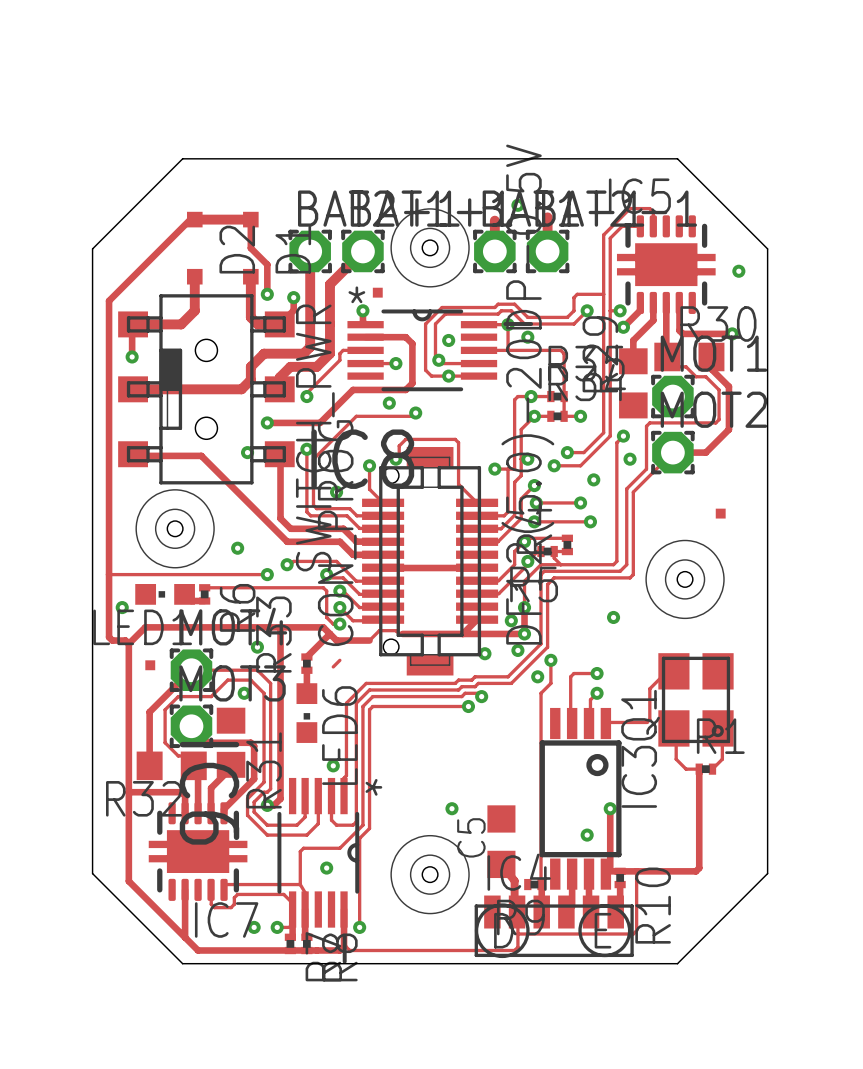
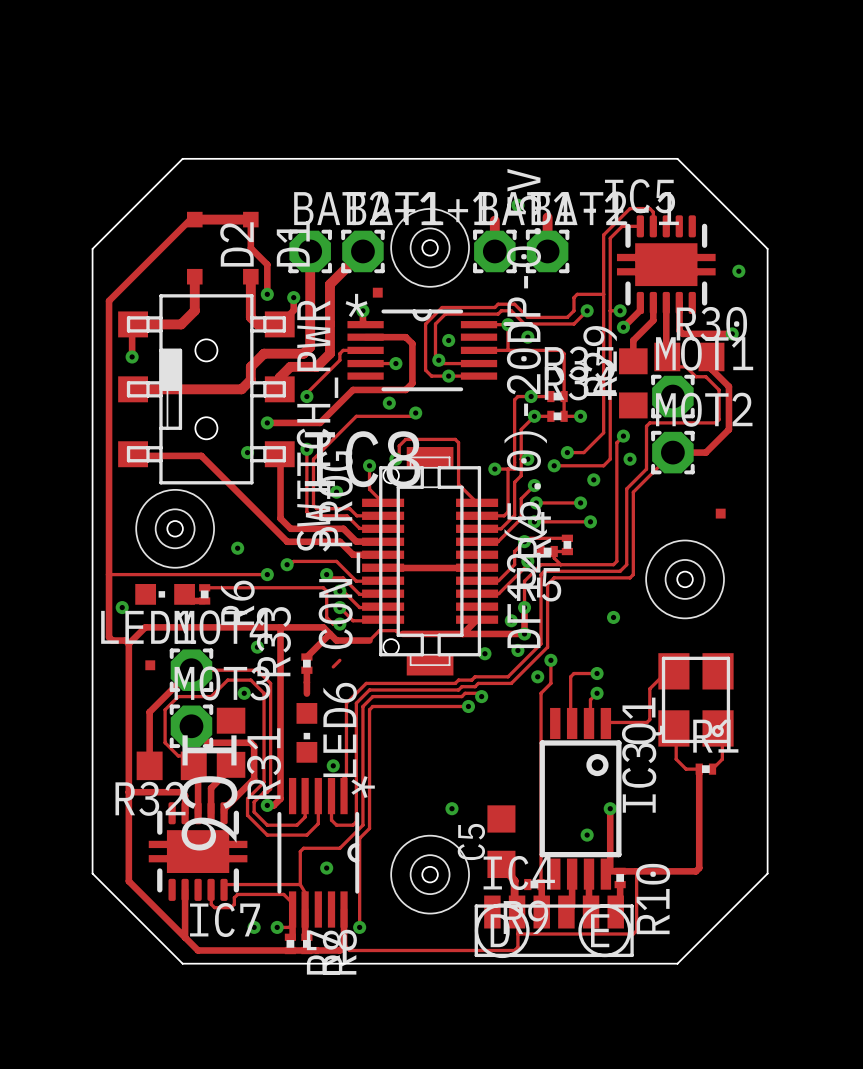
track: (610, 436) (580, 465) -> (610, 436) (610, 459) (603, 465) (580, 465)
LED6 position: (306, 713) -> (306, 732)

